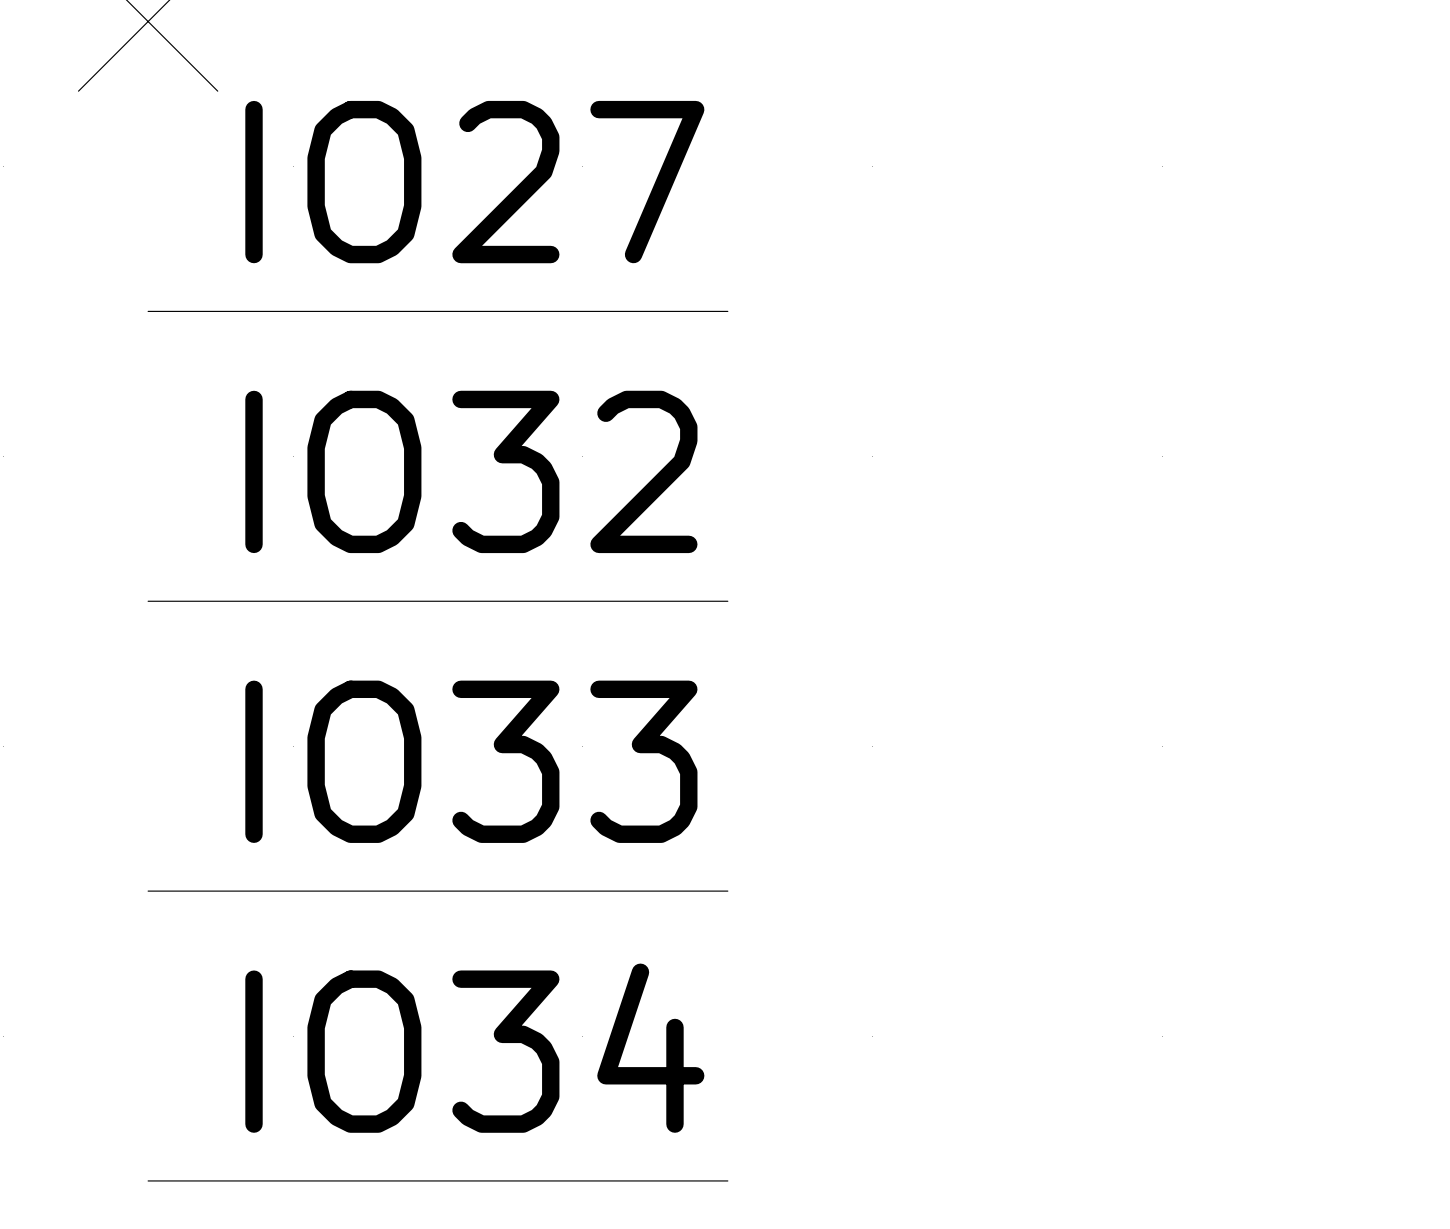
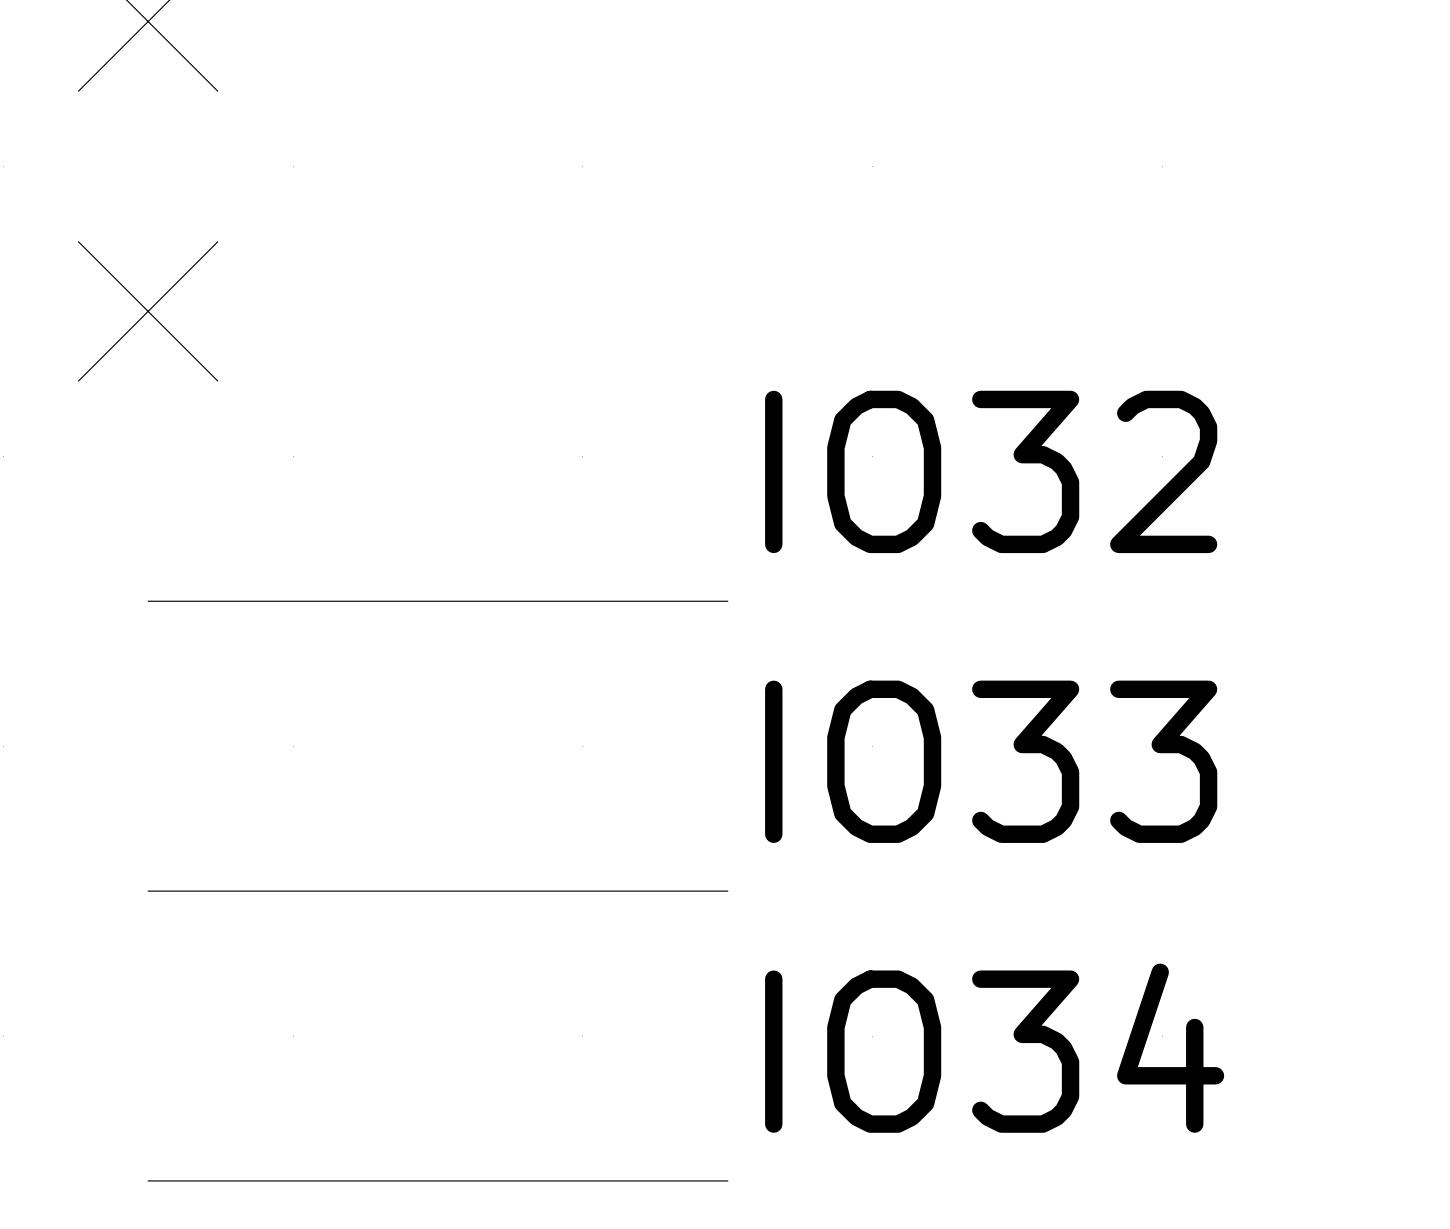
label: IO27 (474, 182) -> none
wire: (148, 311) (727, 311) -> none
no-connect mark: none -> (148, 311)
label position: IO32 (471, 471) -> IO32 (991, 471)
label position: IO33 (471, 761) -> IO33 (991, 761)
label position: IO34 (474, 1048) -> IO34 (994, 1048)

